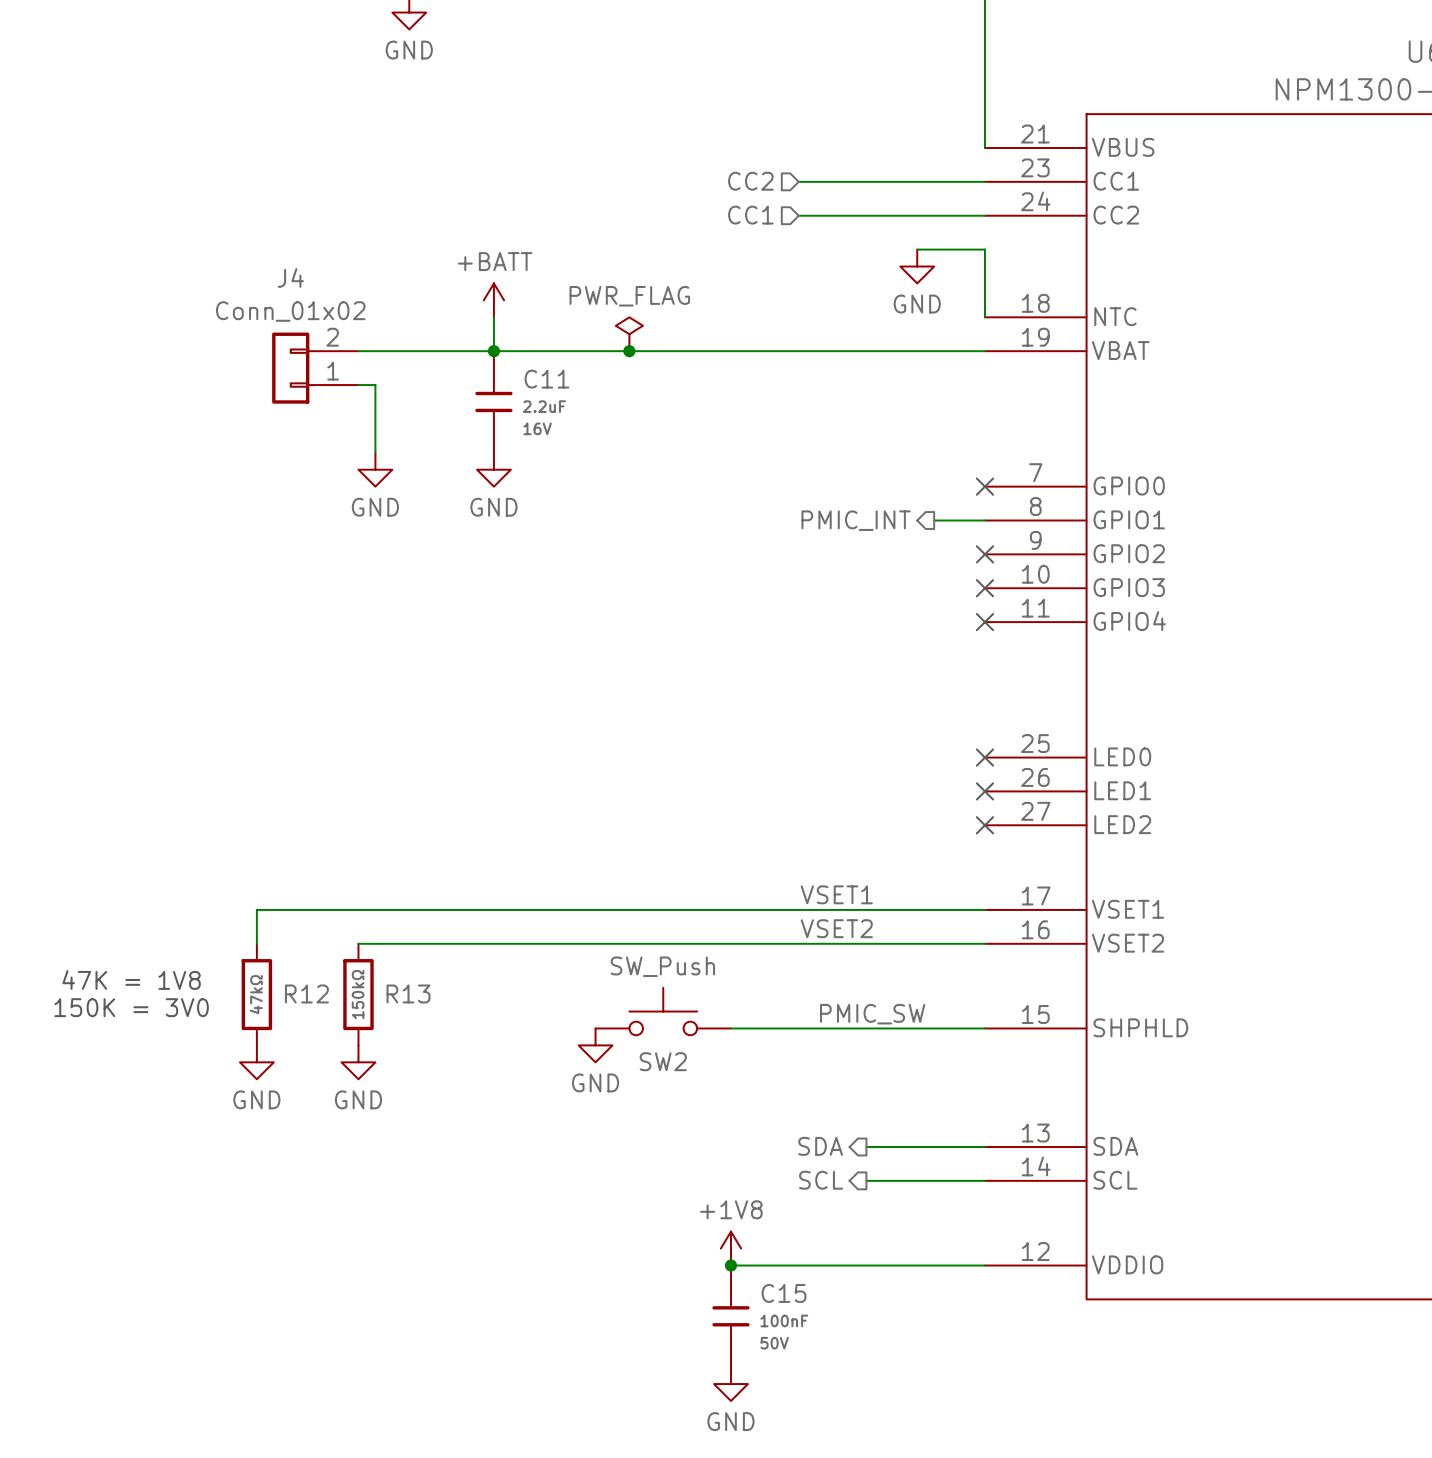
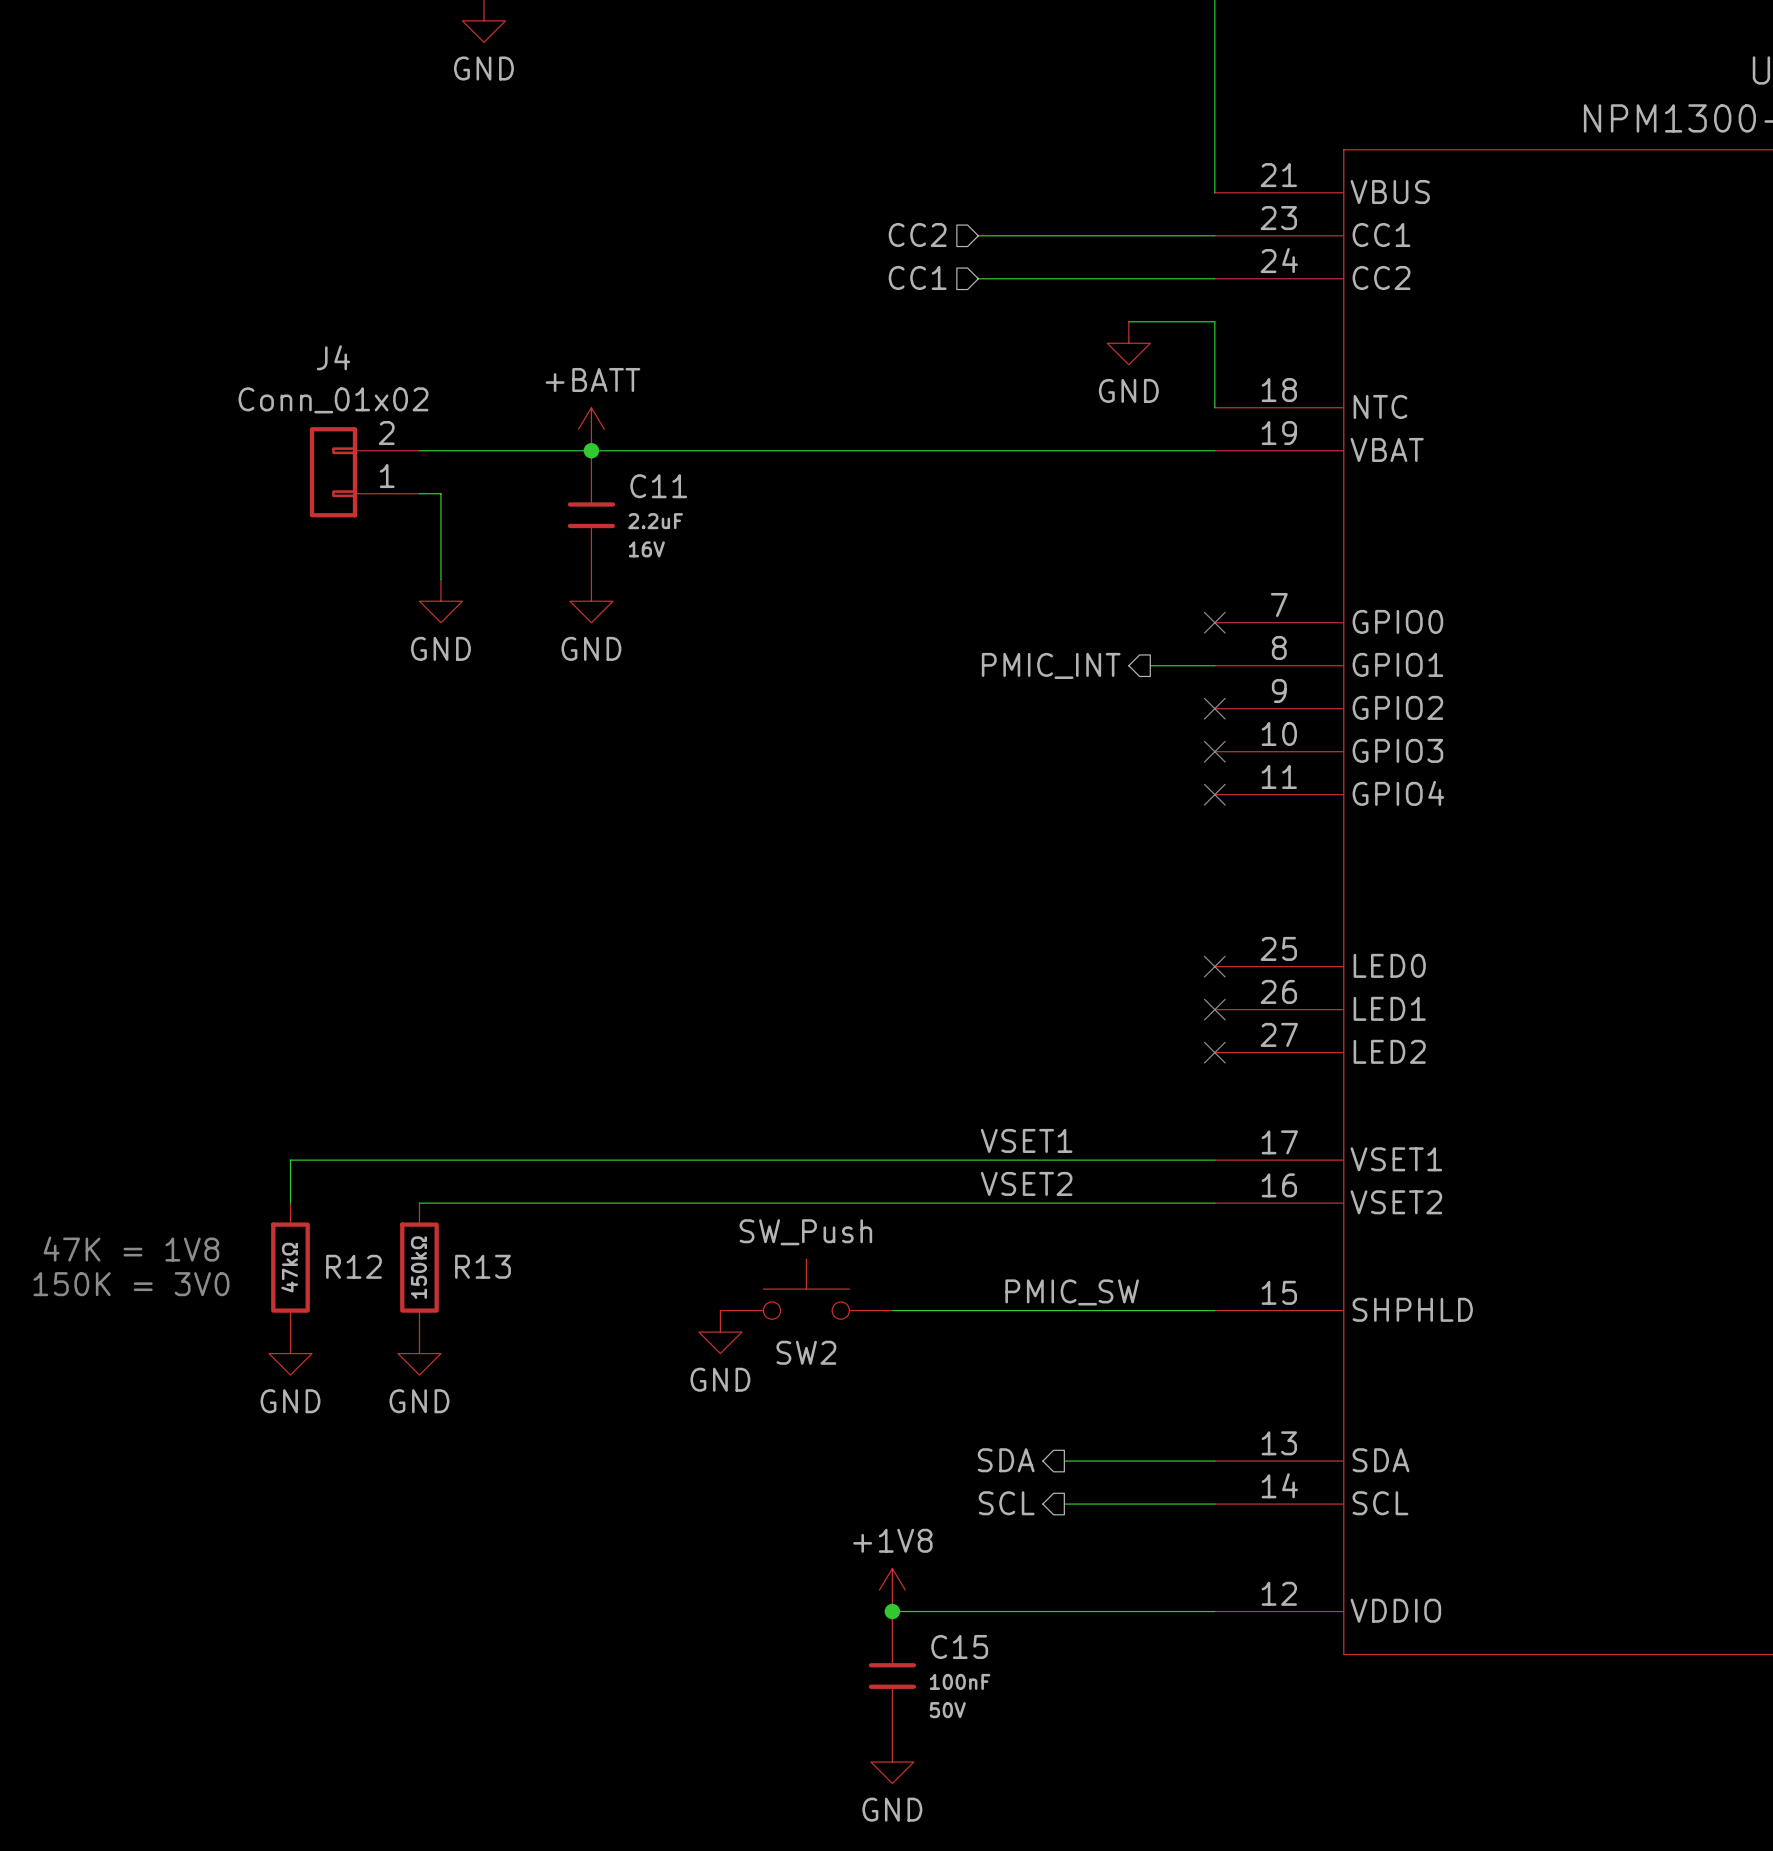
power symbol position: +BATT (493, 300) -> +BATT (591, 429)
power symbol: PWR_FLAG (629, 334) -> none
junction: (629, 351) -> none

